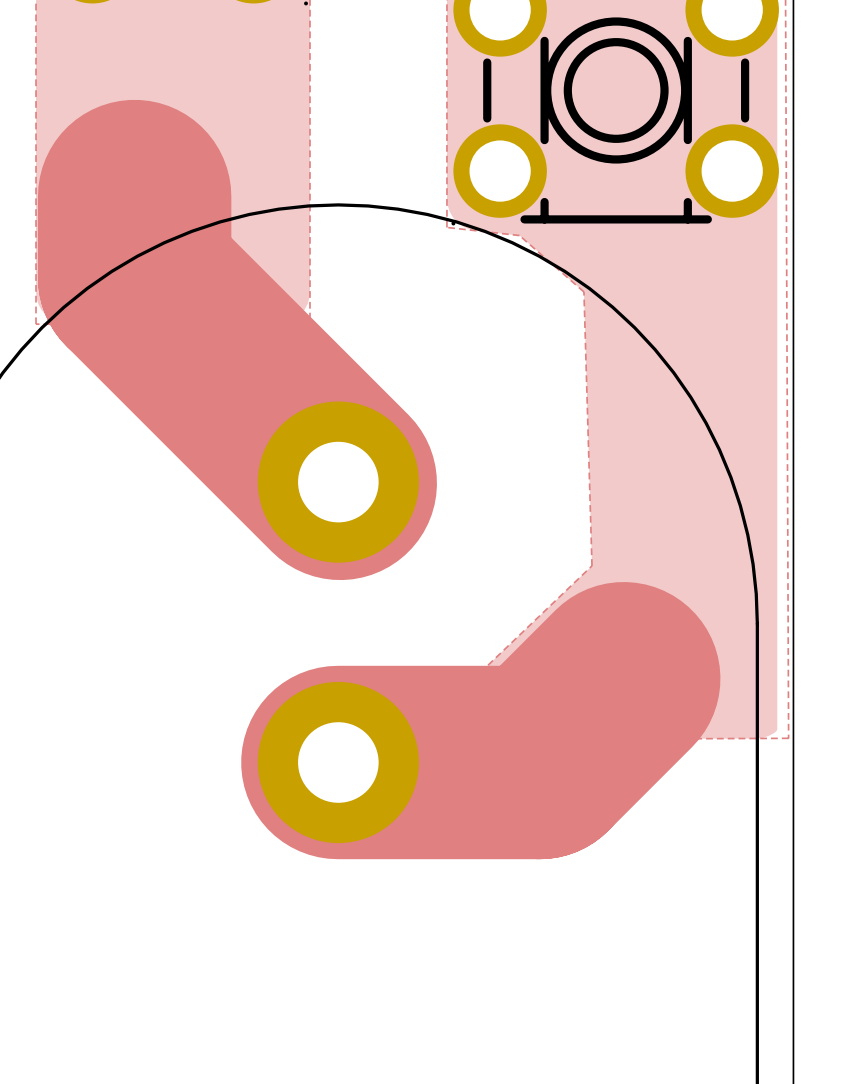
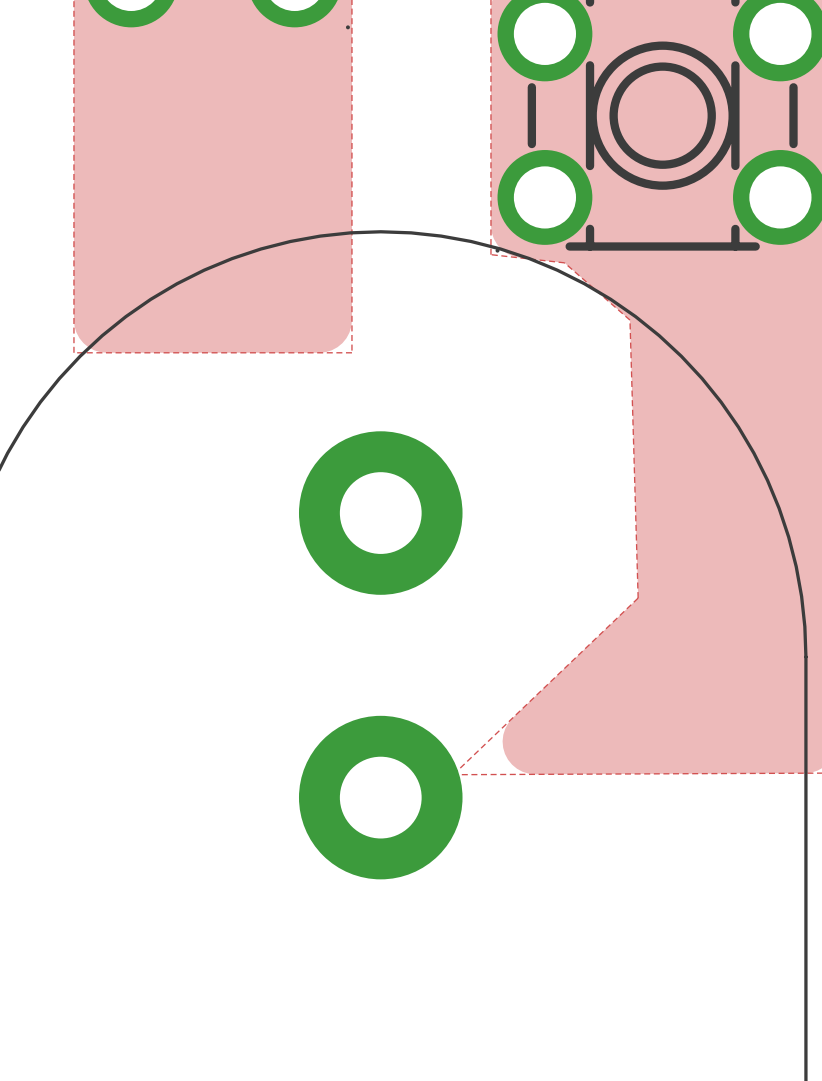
track: (134, 196) (134, 277) (340, 483) -> none
track: (623, 678) (539, 762) (337, 762) -> none

